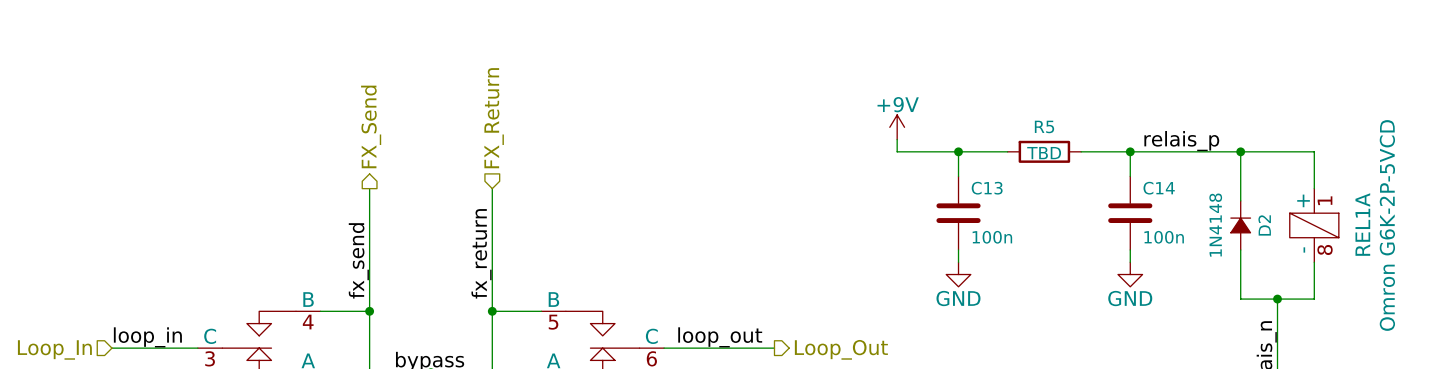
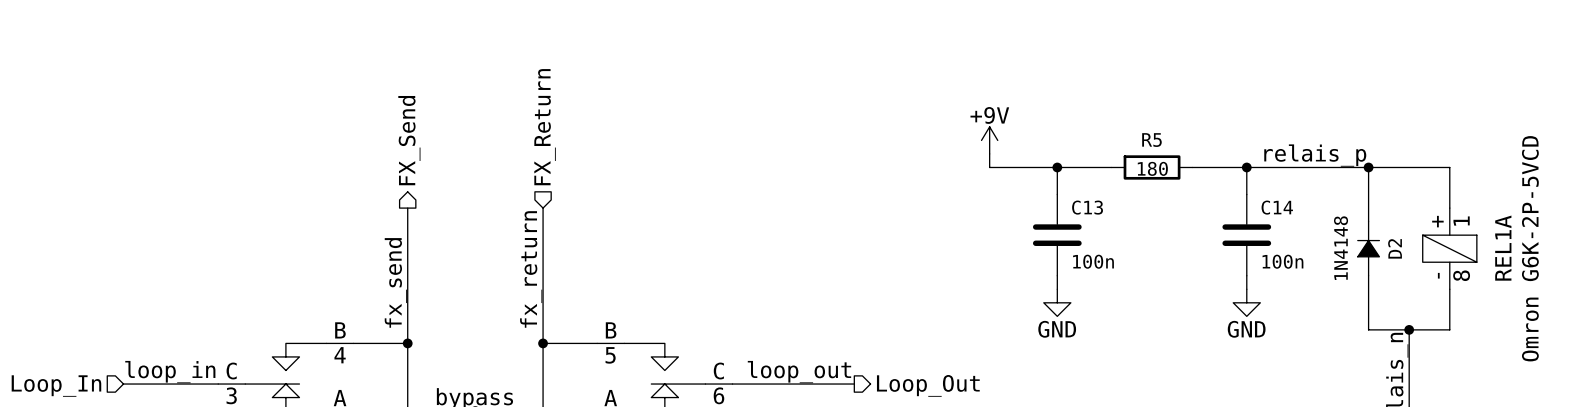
R5 value: TBD (1044, 153) -> 180 (1152, 168)

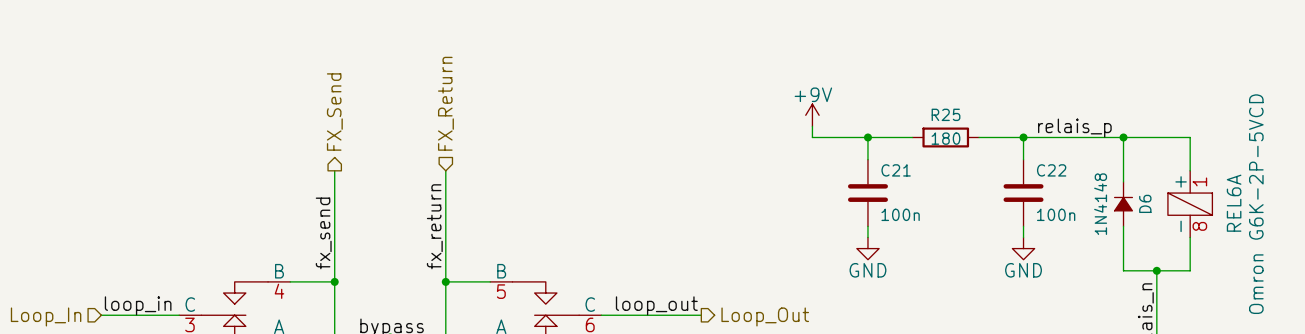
R5 name: R5 (1151, 140) -> R25 (946, 114)
C13 name: C13 (1087, 207) -> C21 (896, 170)
C14 name: C14 (1277, 207) -> C22 (1051, 170)
D2 name: D2 (1395, 248) -> D6 (1145, 203)
REL1A name: REL1A (1503, 248) -> REL6A (1234, 203)

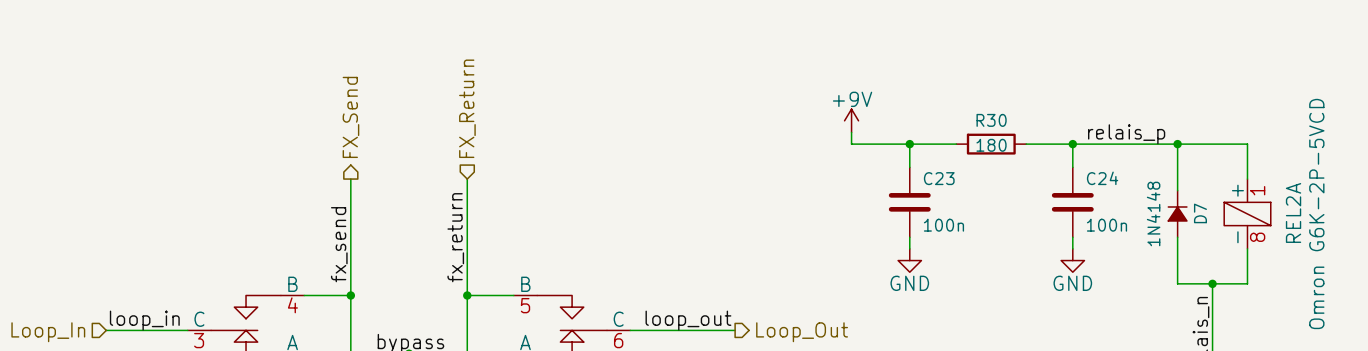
R25 name: R25 (946, 114) -> R30 (991, 120)
C21 name: C21 (896, 170) -> C23 (939, 178)
C22 name: C22 (1051, 170) -> C24 (1102, 178)
D6 name: D6 (1145, 203) -> D7 (1200, 213)
REL6A name: REL6A (1234, 203) -> REL2A (1293, 212)

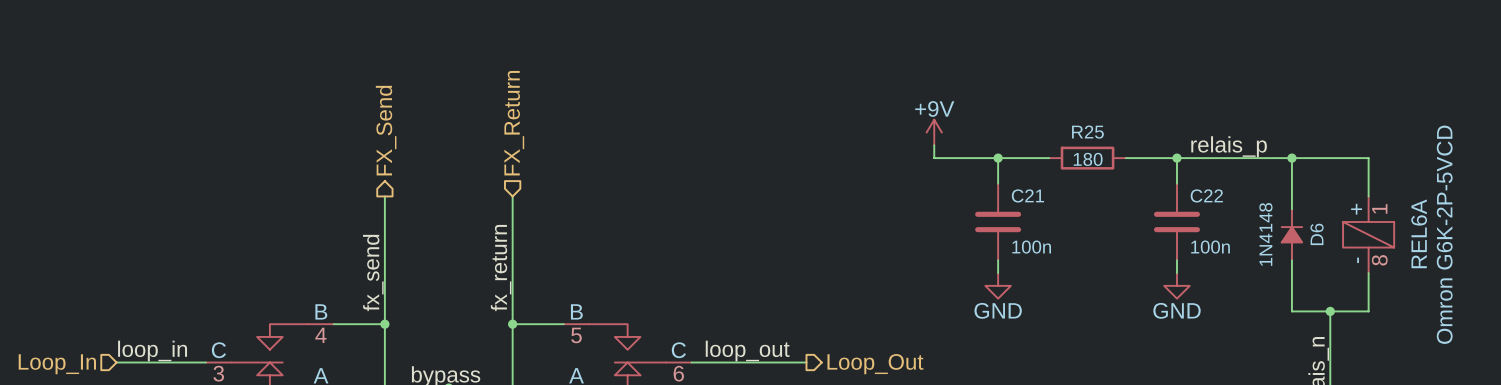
R30 name: R30 (991, 120) -> R25 (1087, 132)
C23 name: C23 (939, 178) -> C21 (1027, 195)
C24 name: C24 (1102, 178) -> C22 (1206, 195)
REL2A name: REL2A (1293, 212) -> REL6A (1419, 233)
D7 name: D7 (1200, 213) -> D6 (1317, 234)

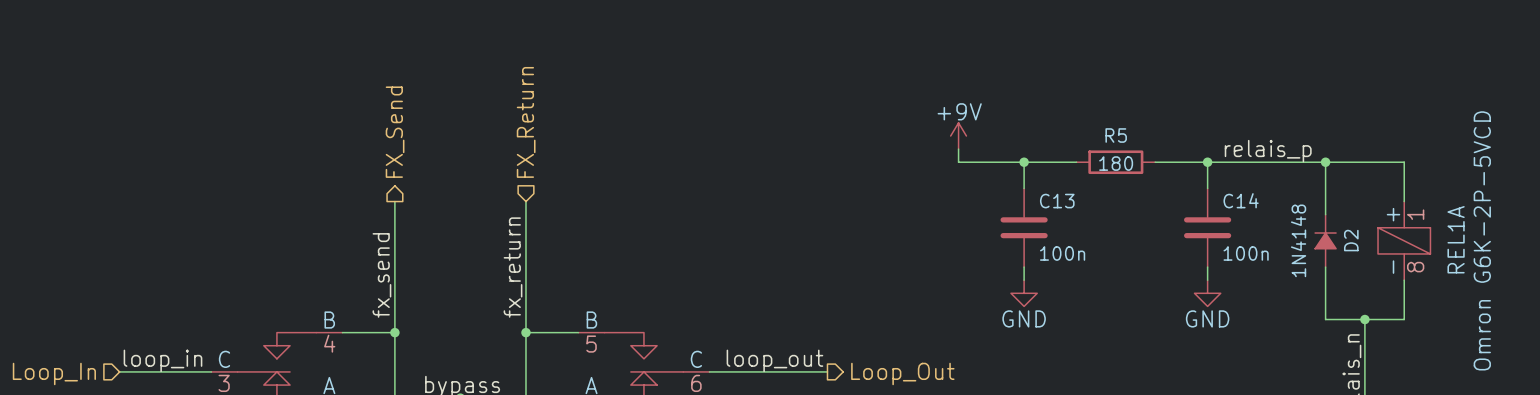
R25 name: R25 (1087, 132) -> R5 (1116, 135)
C21 name: C21 (1027, 195) -> C13 (1057, 201)
C22 name: C22 (1206, 195) -> C14 (1241, 200)
REL6A name: REL6A (1419, 233) -> REL1A (1456, 239)
D6 name: D6 (1317, 234) -> D2 (1351, 240)

